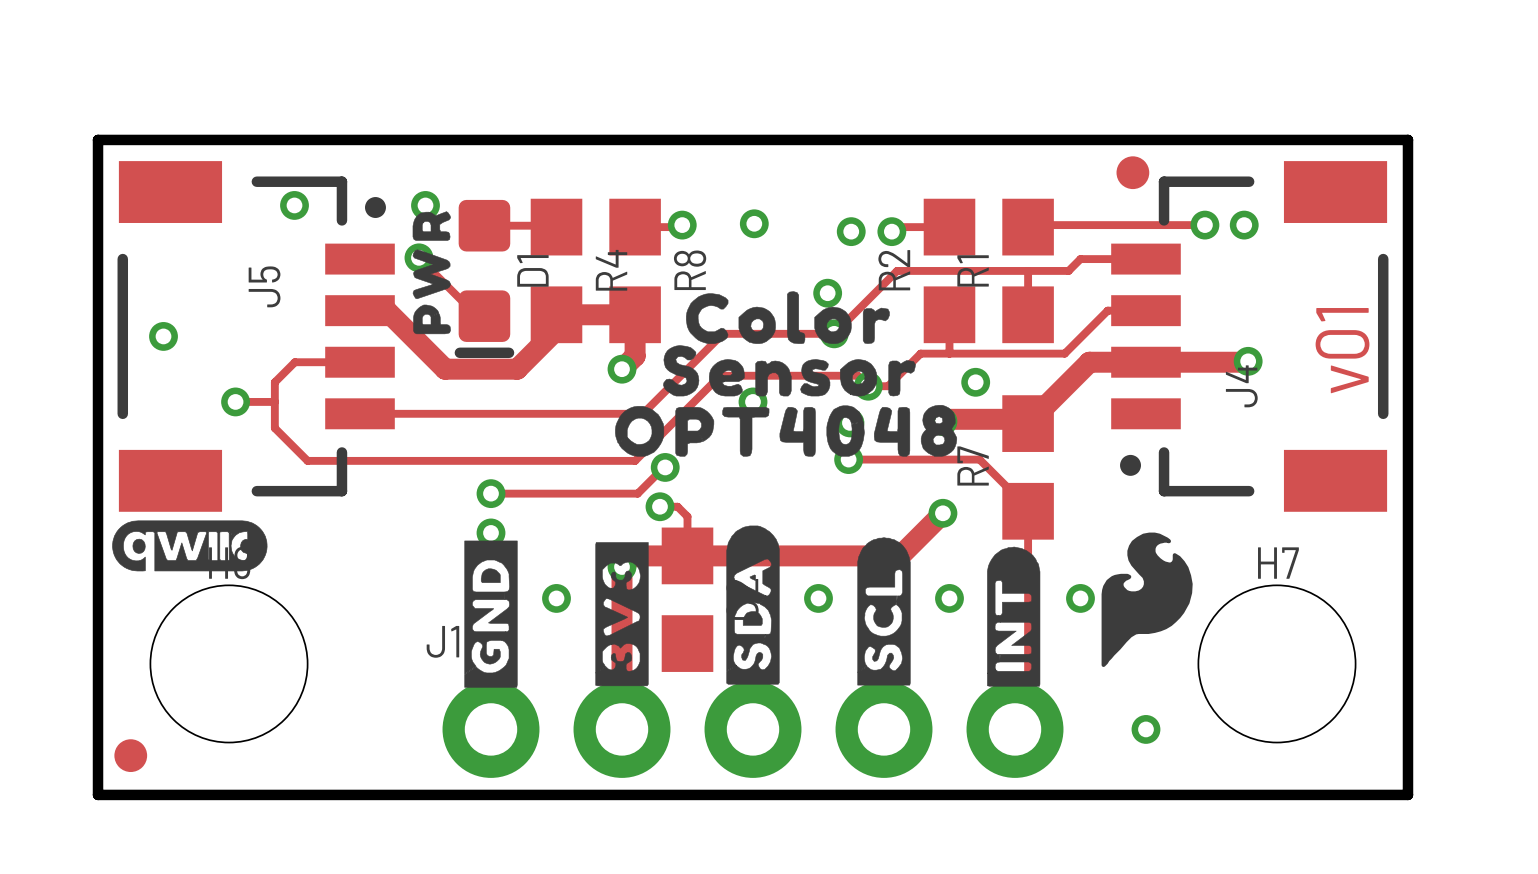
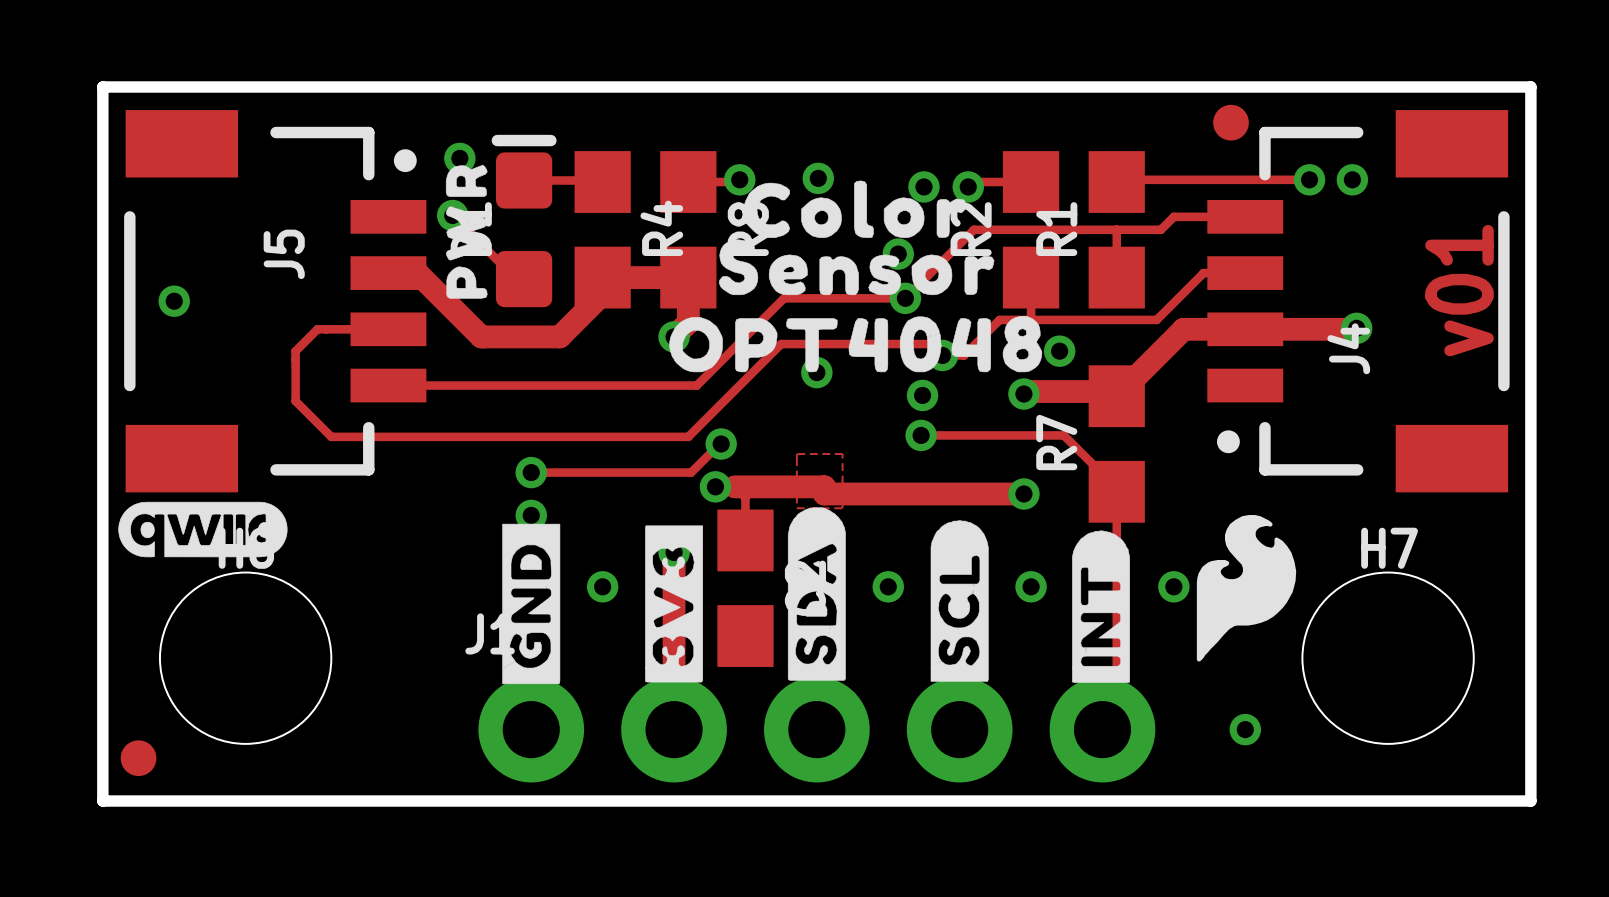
via: (294, 205) -> none
D1 rotation: 0° (484, 278) -> 180° (524, 221)
drawing position: (787, 317) -> (854, 209)
drawing position: (789, 370) -> (856, 267)
track: (235, 401) (274, 401) -> none
via: (235, 401) -> none
drawing position: (786, 430) -> (855, 344)
zone outline: none -> (796, 454) (796, 508) (842, 508) (842, 454) (796, 454)
track: (942, 513) (900, 555) (633, 555) -> (1023, 493) (824, 493) (824, 486) (734, 486)

